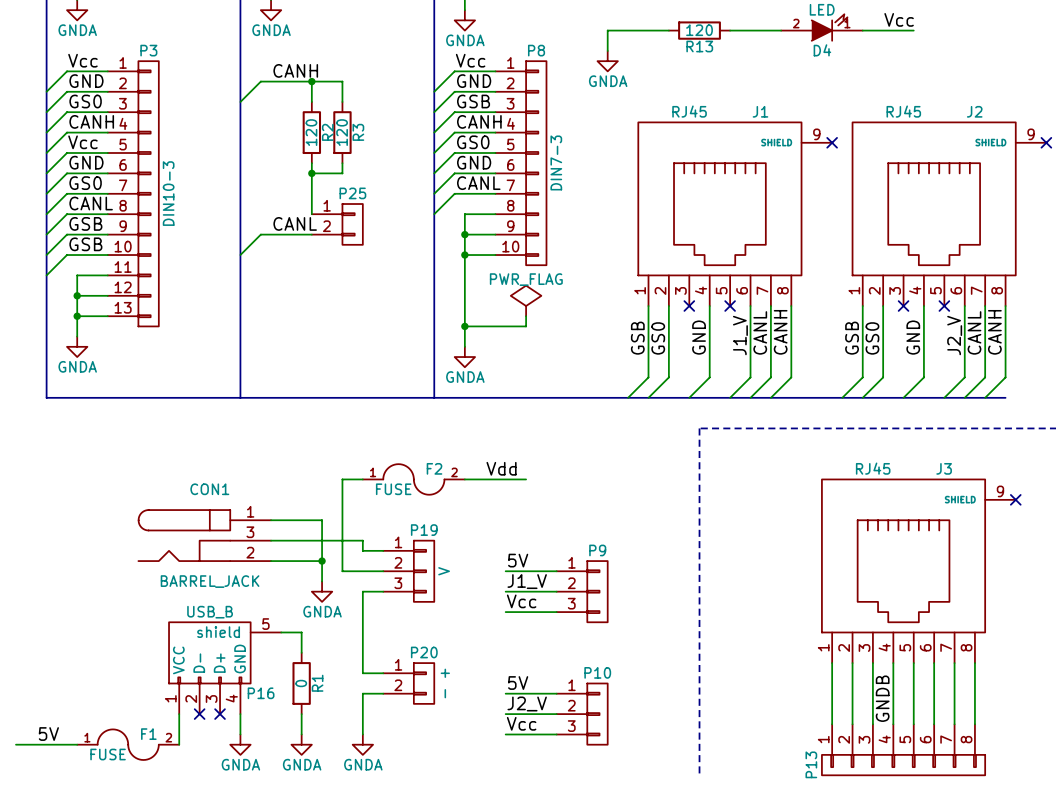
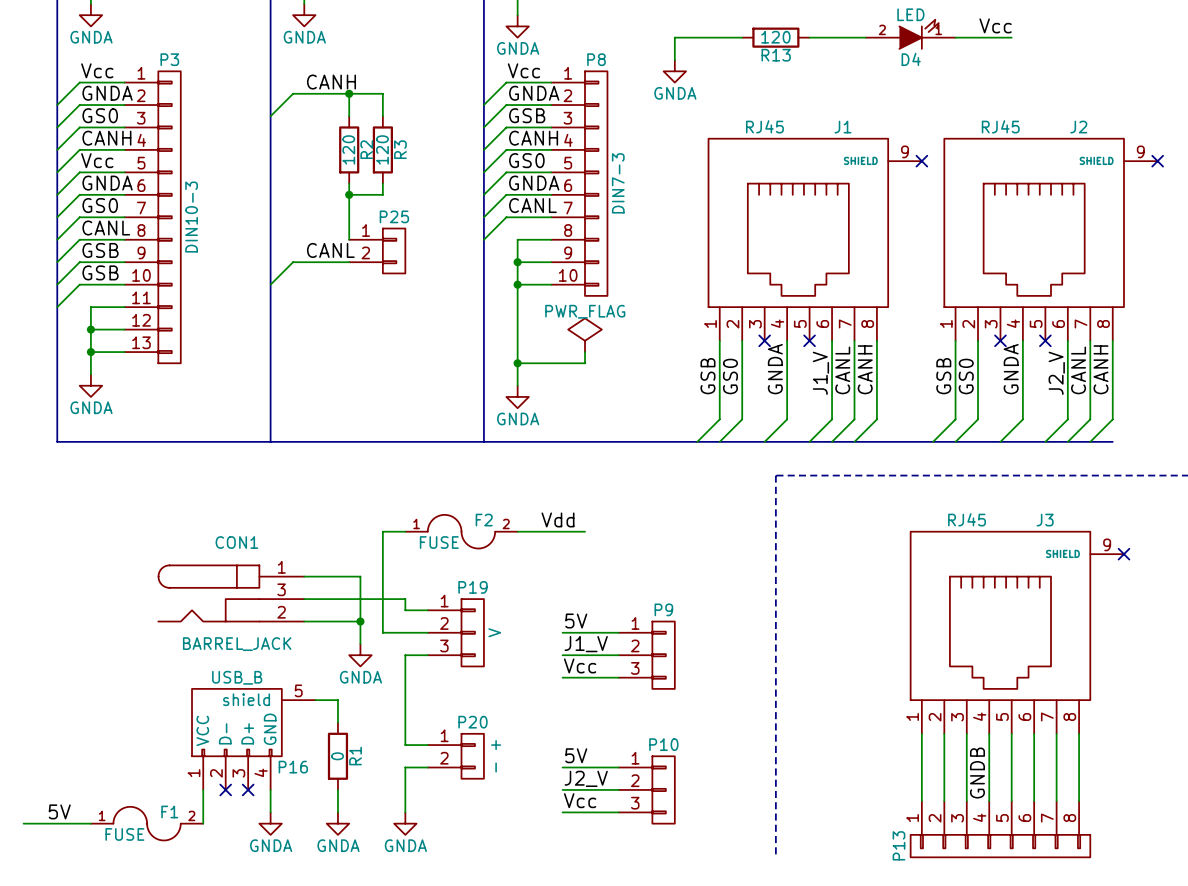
label: GND (86, 81) -> GNDA (107, 93)
label: GND (474, 81) -> GNDA (534, 93)
label: GND (86, 162) -> GNDA (107, 183)
label: GND (474, 162) -> GNDA (534, 183)
label: GND (699, 337) -> GNDA (775, 369)
label: GND (913, 337) -> GNDA (1011, 369)

